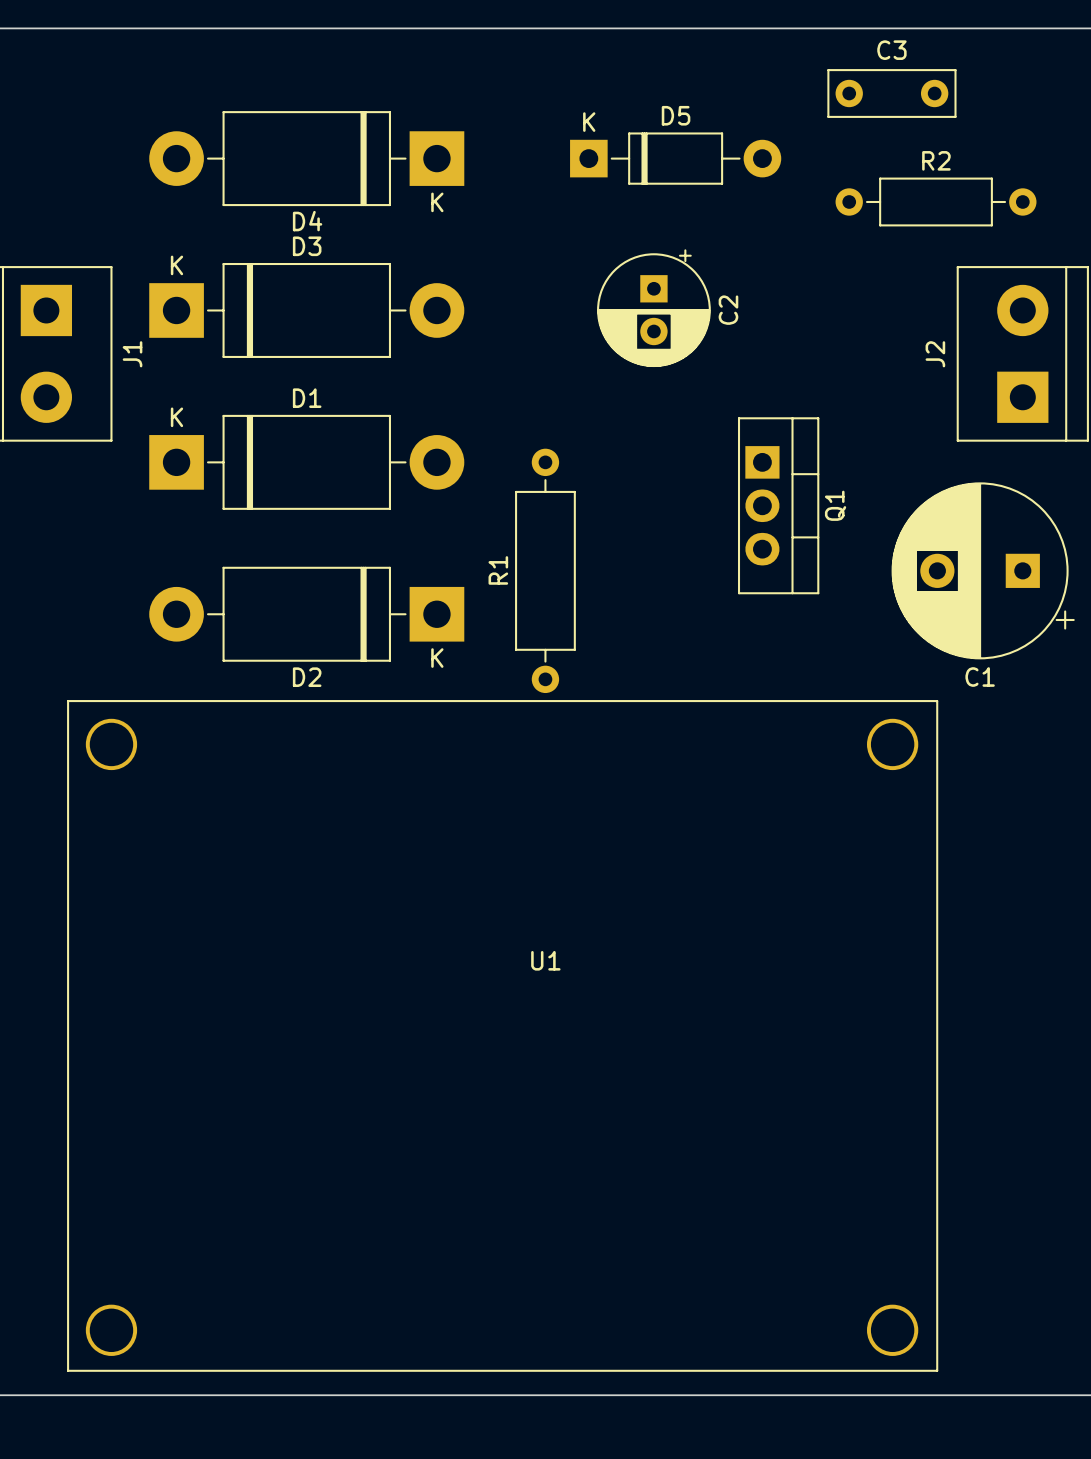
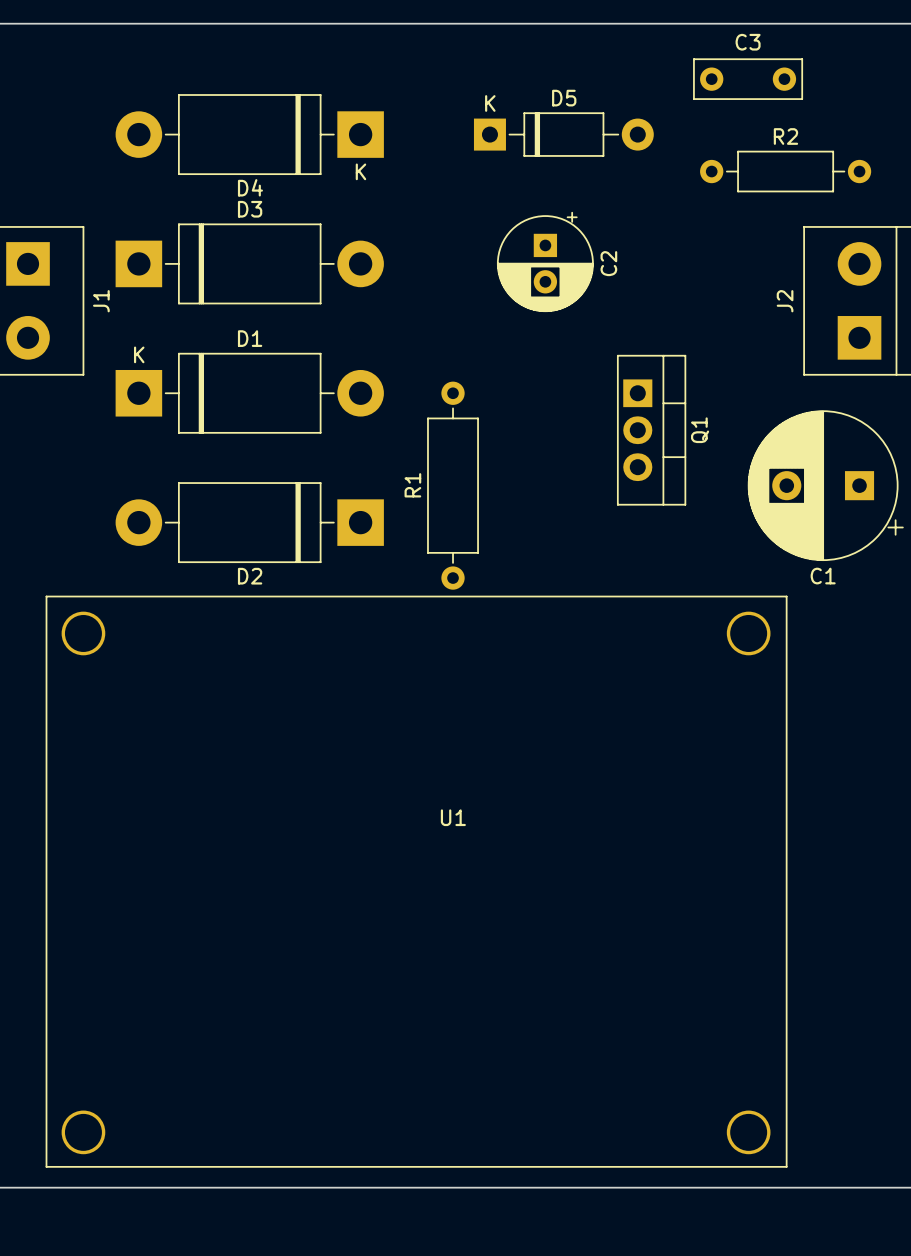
D3 text: K (176, 265) -> none
D2 text: K (437, 658) -> none

